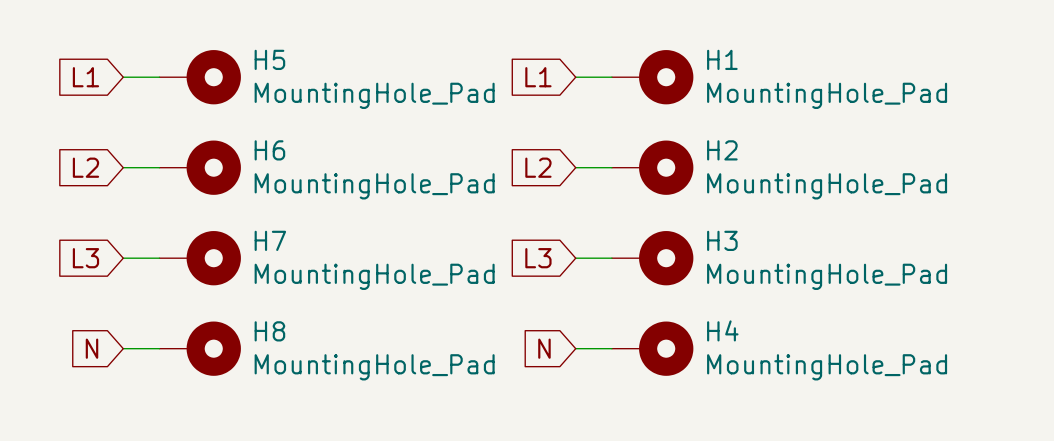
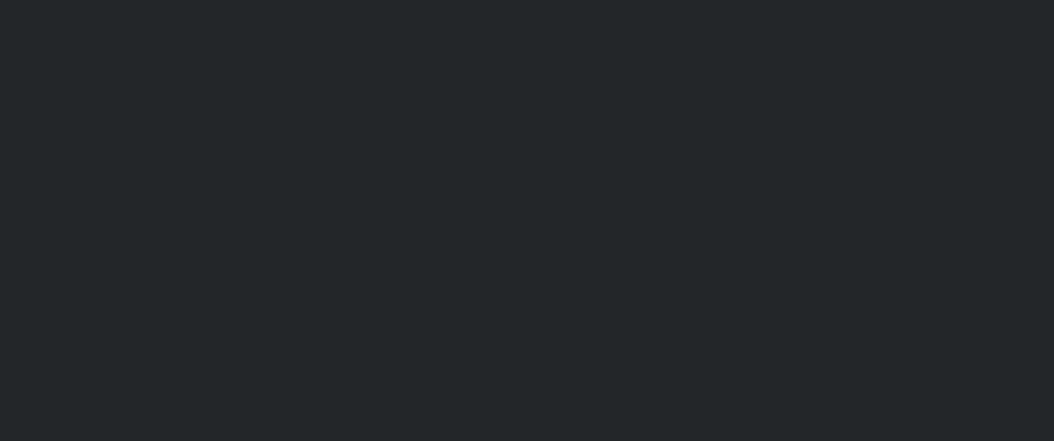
global label: L1 (85, 77) -> none
wire: (123, 77) (159, 77) -> none
H5: MountingHole_Pad (200, 77) -> none
global label: L1 (538, 77) -> none
wire: (575, 77) (611, 77) -> none
H1: MountingHole_Pad (652, 77) -> none
global label: L2 (85, 167) -> none
wire: (123, 167) (159, 167) -> none
H6: MountingHole_Pad (200, 167) -> none
global label: L2 (538, 167) -> none
wire: (575, 167) (611, 167) -> none
H2: MountingHole_Pad (652, 167) -> none
global label: L3 (85, 258) -> none
wire: (123, 258) (159, 258) -> none
H7: MountingHole_Pad (200, 258) -> none
global label: L3 (538, 258) -> none
wire: (575, 258) (611, 258) -> none
H3: MountingHole_Pad (652, 258) -> none
global label: N (91, 348) -> none
wire: (123, 348) (159, 348) -> none
H8: MountingHole_Pad (200, 348) -> none
global label: N (544, 348) -> none
wire: (575, 348) (611, 348) -> none
H4: MountingHole_Pad (652, 348) -> none

